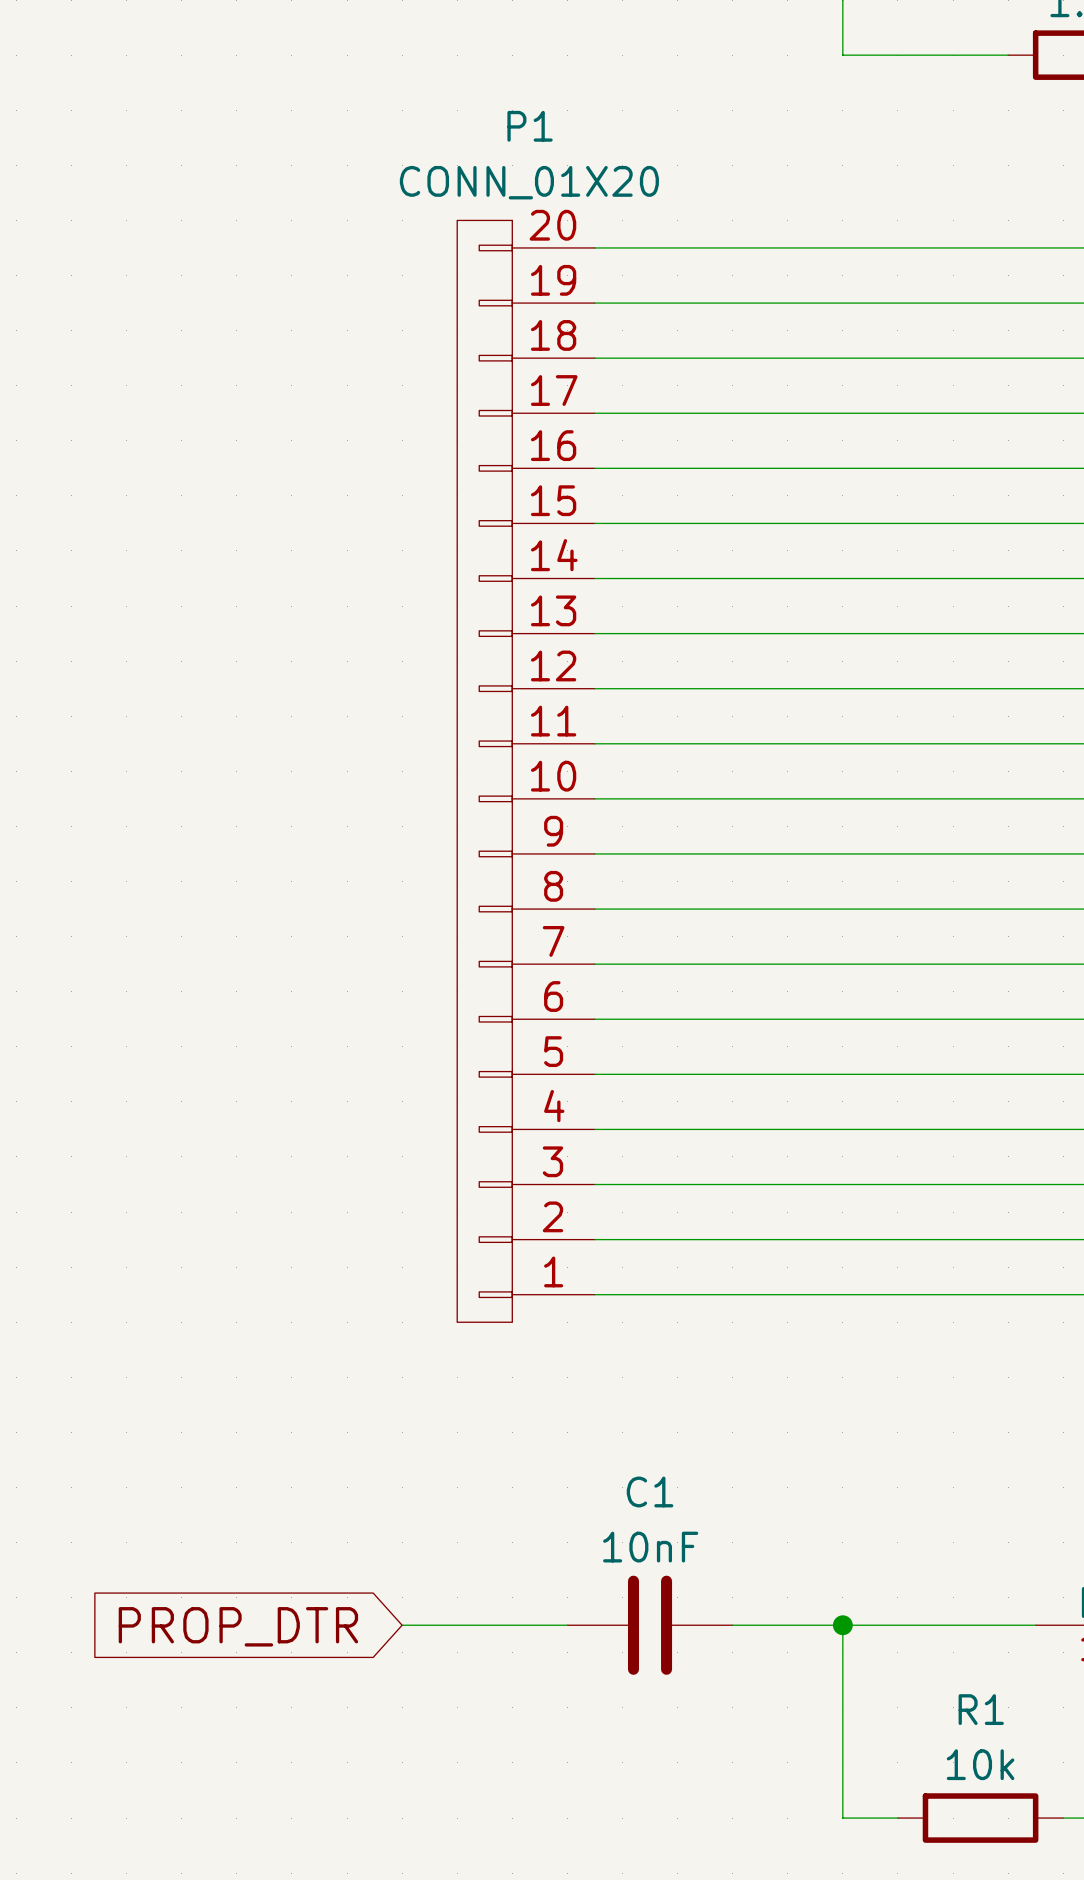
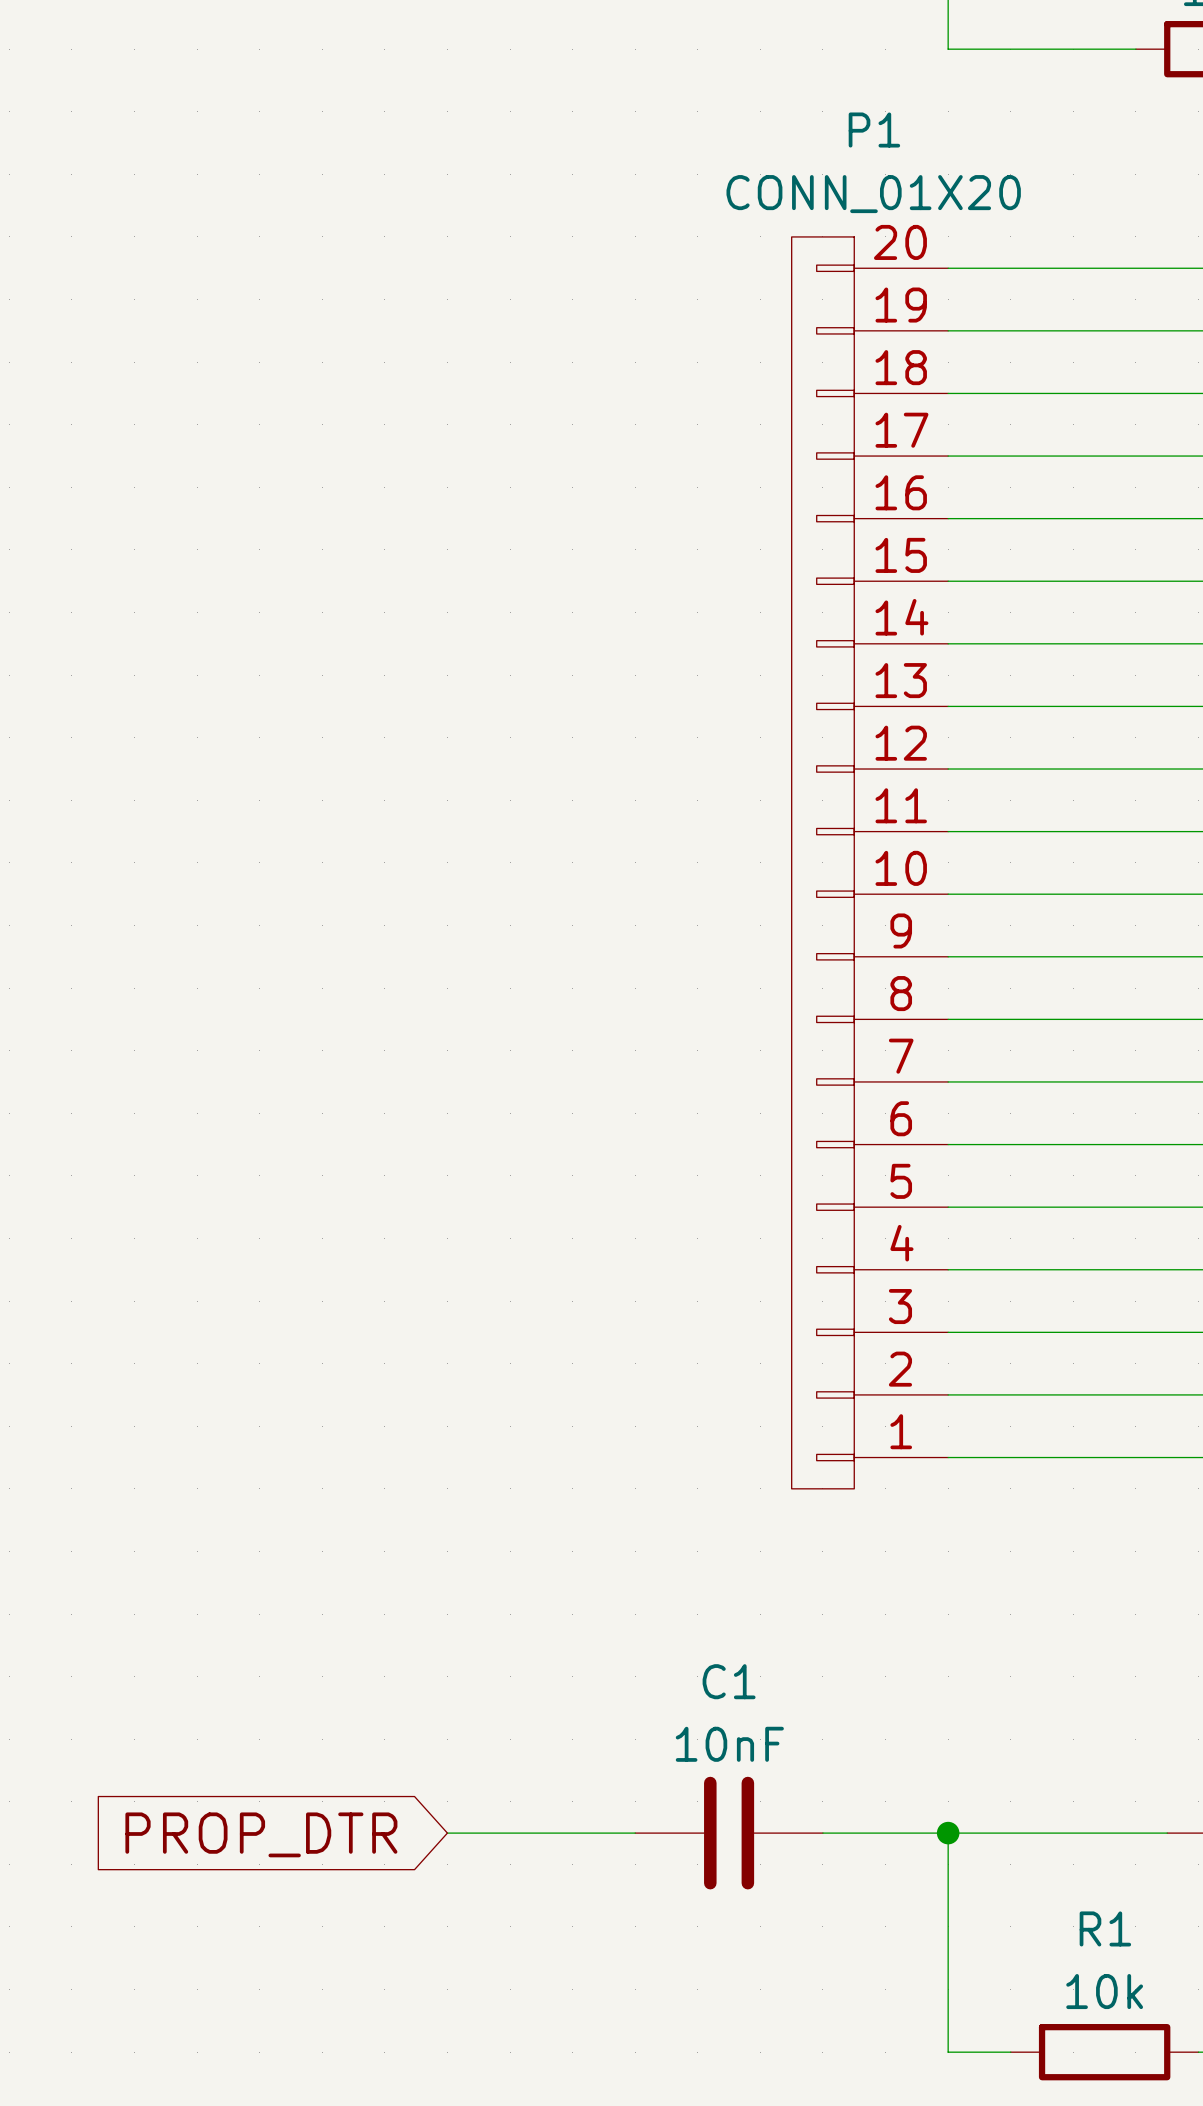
wire: (594, 247) (842, 247) -> none
wire: (594, 303) (842, 303) -> none
wire: (594, 358) (842, 358) -> none
wire: (594, 413) (842, 413) -> none
wire: (594, 468) (842, 468) -> none
wire: (594, 523) (842, 523) -> none
wire: (594, 578) (842, 578) -> none
wire: (594, 633) (842, 633) -> none
wire: (594, 688) (842, 688) -> none
wire: (594, 743) (842, 743) -> none
P1 position: (526, 771) -> (869, 862)
wire: (594, 798) (842, 798) -> none
wire: (594, 853) (842, 853) -> none
wire: (594, 909) (842, 909) -> none
wire: (594, 964) (842, 964) -> none
wire: (594, 1019) (842, 1019) -> none
wire: (594, 1074) (842, 1074) -> none
wire: (594, 1129) (842, 1129) -> none
wire: (594, 1184) (842, 1184) -> none
wire: (594, 1239) (842, 1239) -> none
wire: (594, 1294) (842, 1294) -> none

